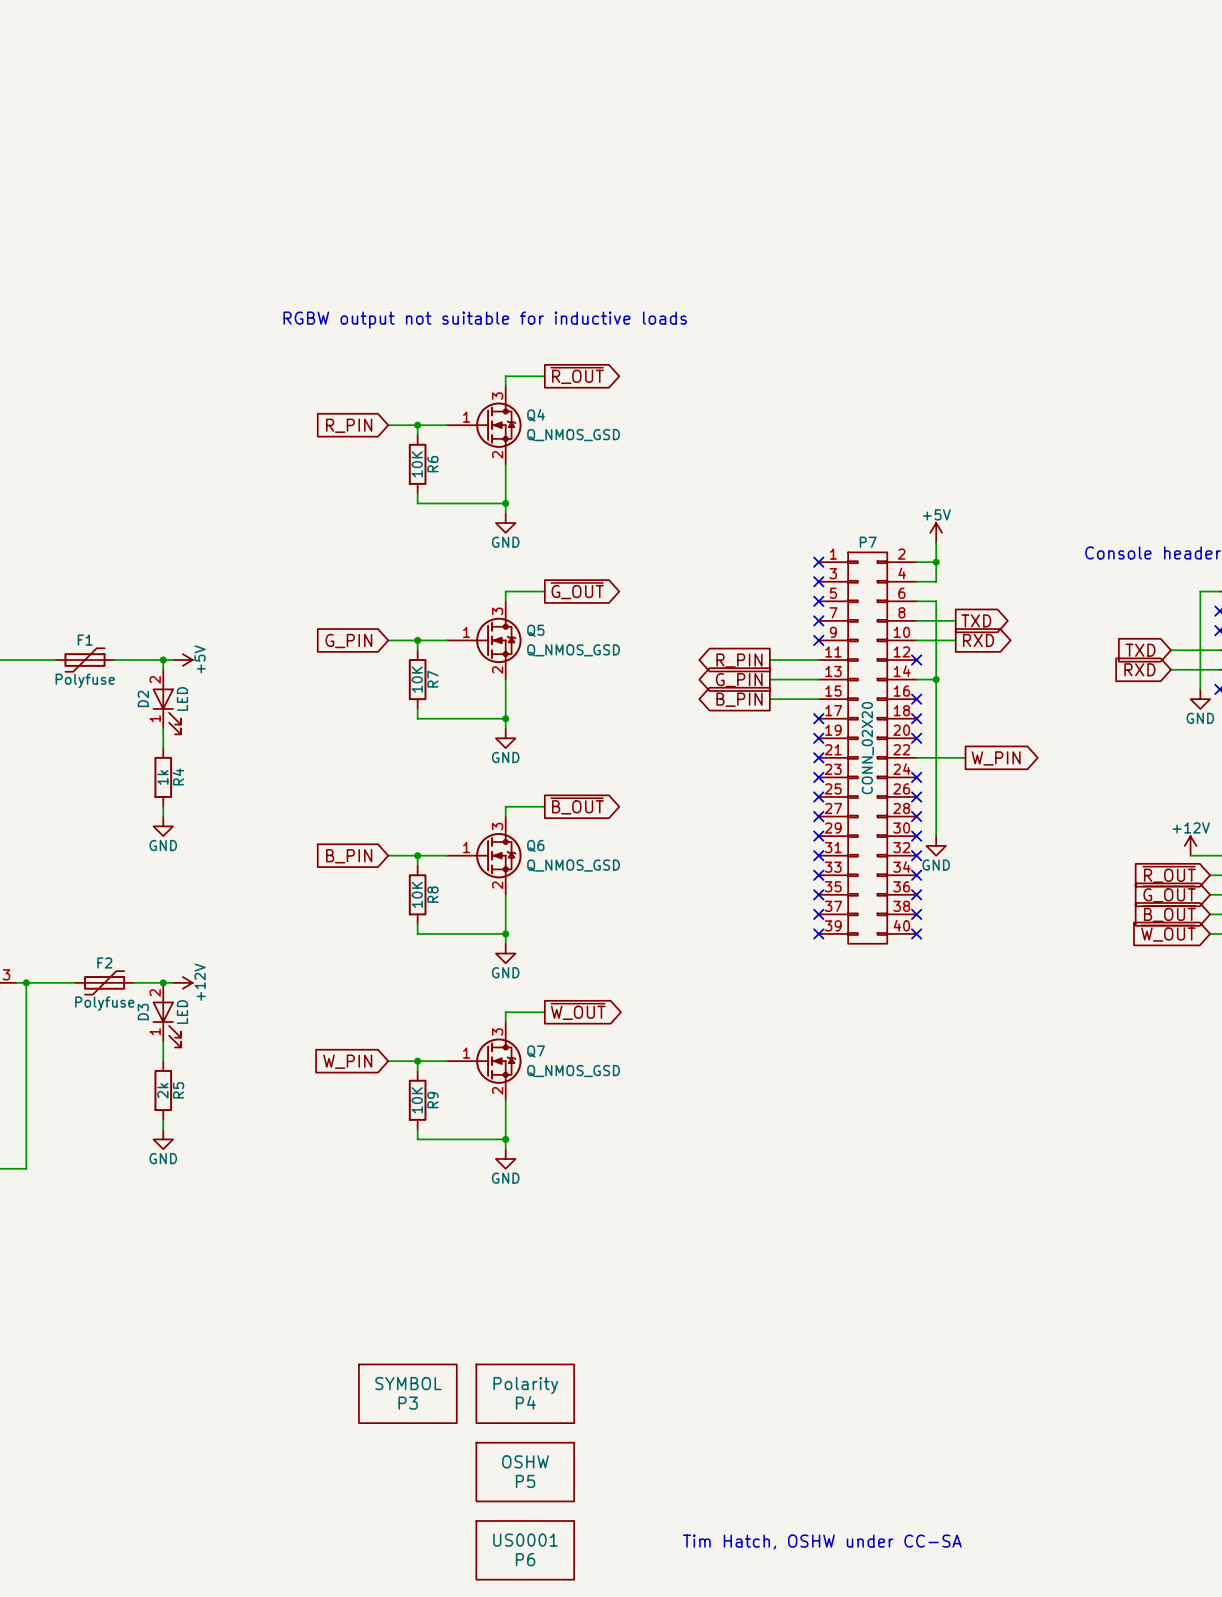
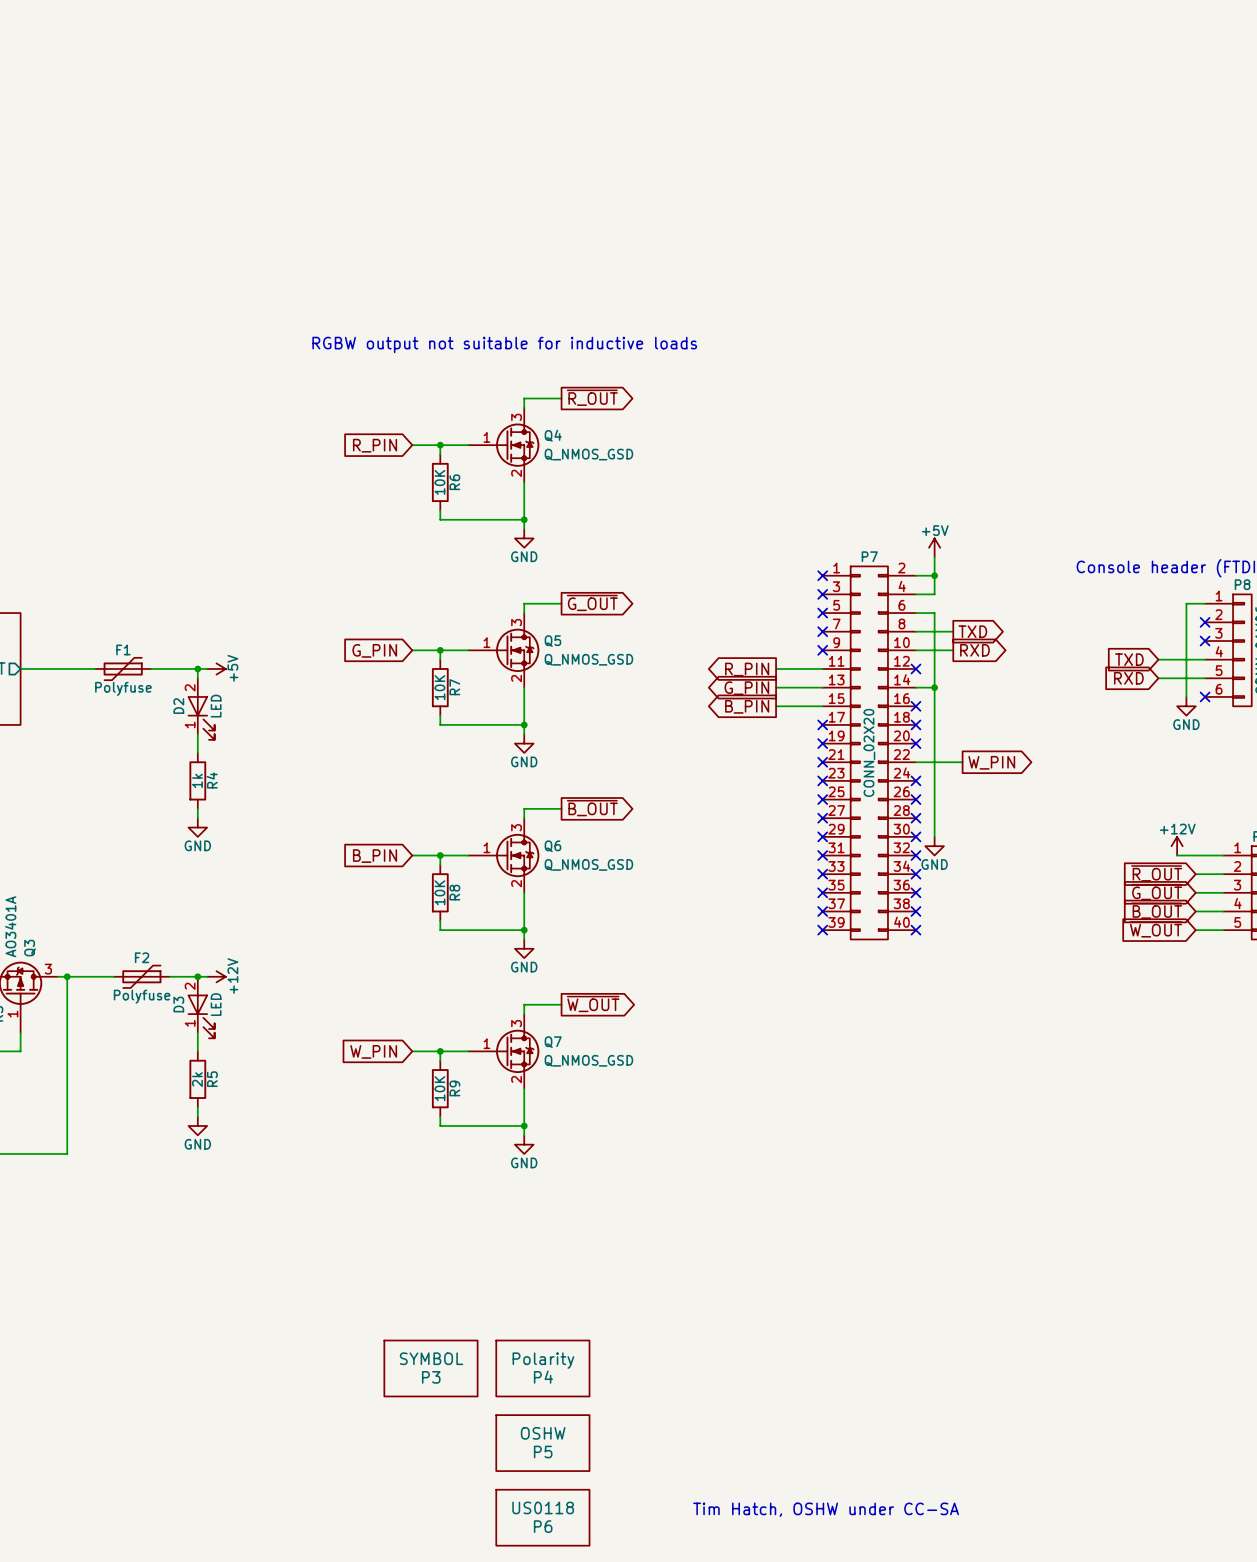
P6 value: US0001 (525, 1540) -> US0118 (543, 1507)

